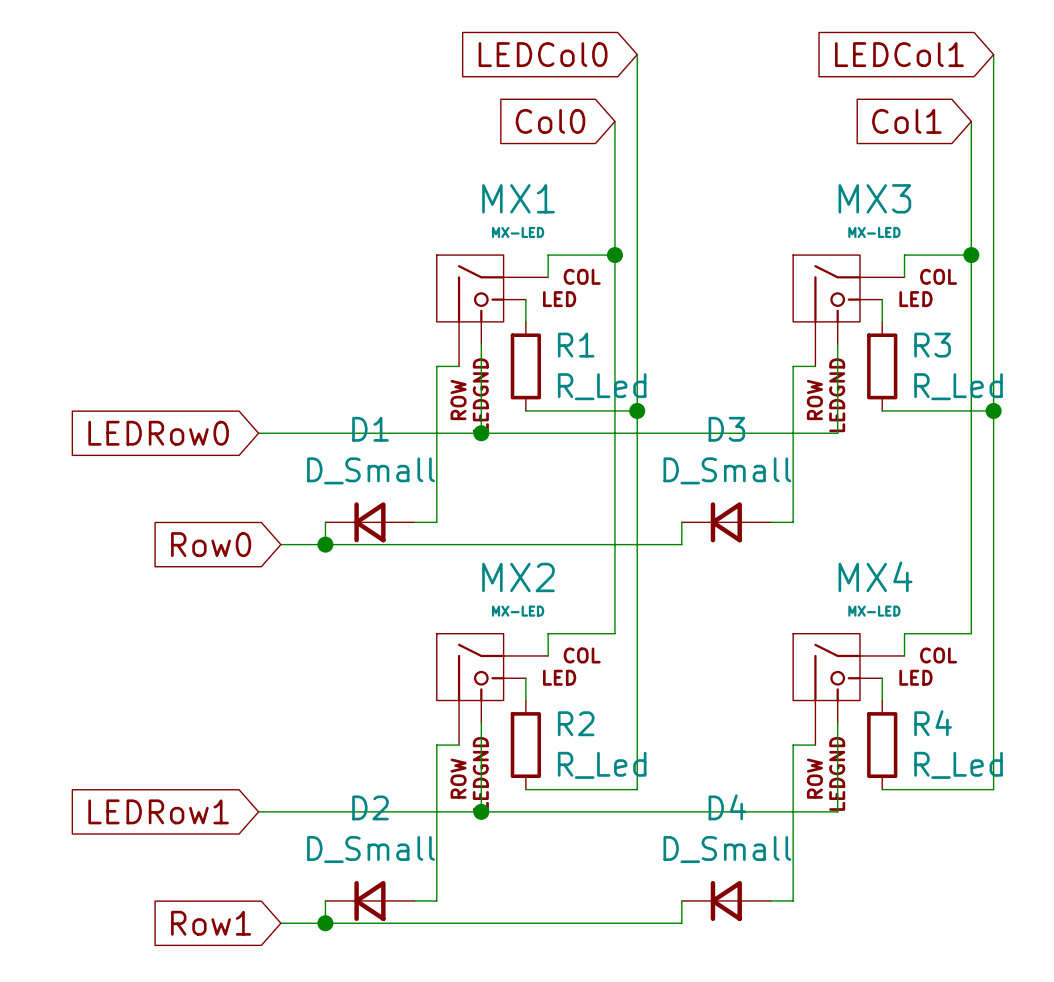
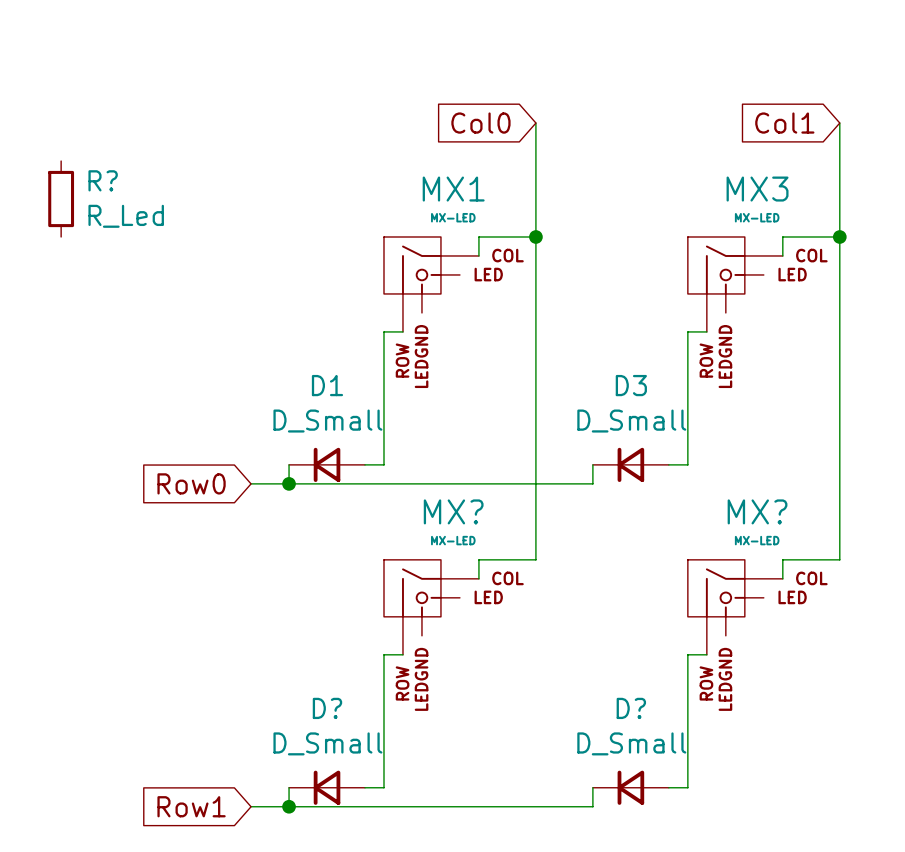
global label: LEDCol0 (543, 54) -> none
wire: (637, 54) (637, 789) (525, 789) -> none
global label: LEDCol1 (899, 54) -> none
wire: (993, 54) (993, 789) (882, 789) -> none
R?: none -> R_Led (61, 199)
wire: (525, 299) (525, 321) -> none
wire: (882, 299) (882, 321) -> none
wire: (481, 344) (481, 433) -> none
wire: (837, 344) (837, 433) (258, 433) -> none
R1: R_Led (525, 366) -> none
R3: R_Led (882, 366) -> none
wire: (525, 410) (637, 410) -> none
junction: (637, 410) -> none
wire: (882, 410) (993, 410) -> none
junction: (993, 410) -> none
global label: LEDRow0 (158, 433) -> none
junction: (481, 433) -> none
MX4 name: MX4 (875, 576) -> MX? (757, 511)
MX2 name: MX2 (518, 577) -> MX? (453, 511)
wire: (525, 678) (525, 700) -> none
wire: (882, 678) (882, 700) -> none
wire: (481, 722) (481, 811) -> none
wire: (837, 722) (837, 811) (258, 811) -> none
R2: R_Led (525, 745) -> none
R4: R_Led (882, 745) -> none
D2 name: D2 (370, 807) -> D? (327, 708)
D4 name: D4 (727, 807) -> D? (631, 708)
global label: LEDRow1 (158, 811) -> none
junction: (481, 811) -> none

